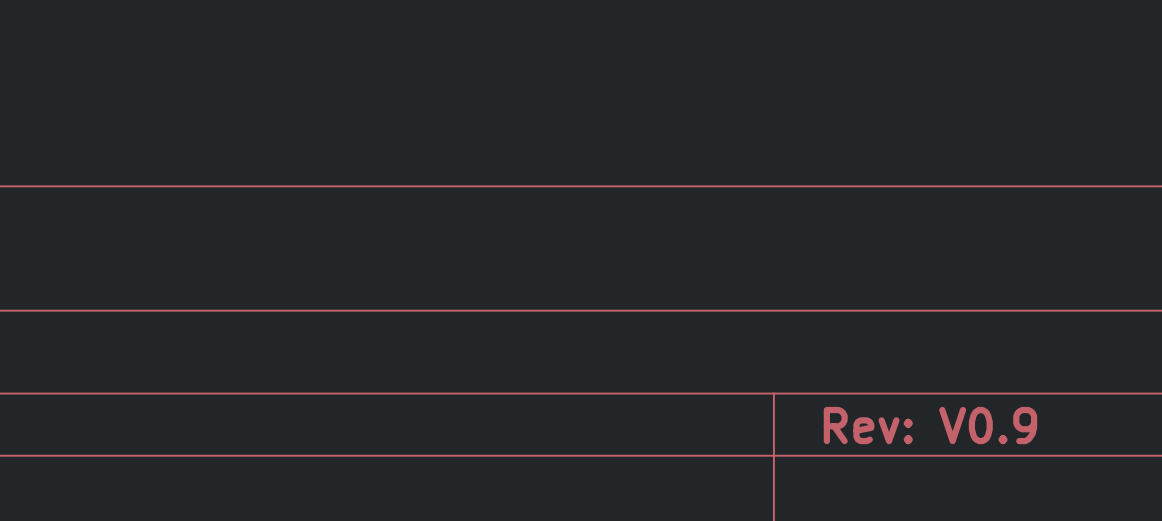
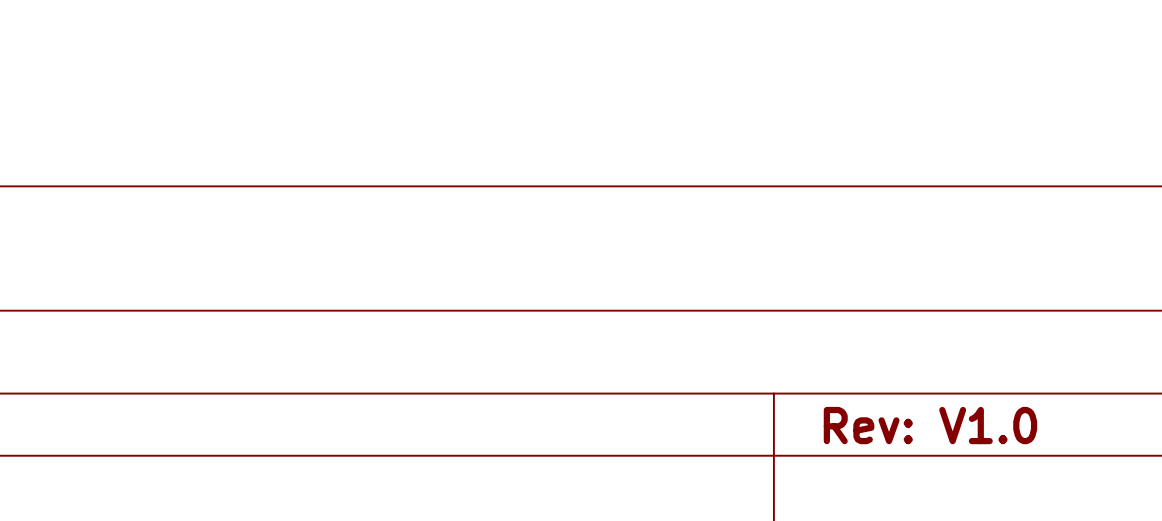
title block: Rev: V0.9 (930, 425) -> Rev: V1.0 (930, 425)

